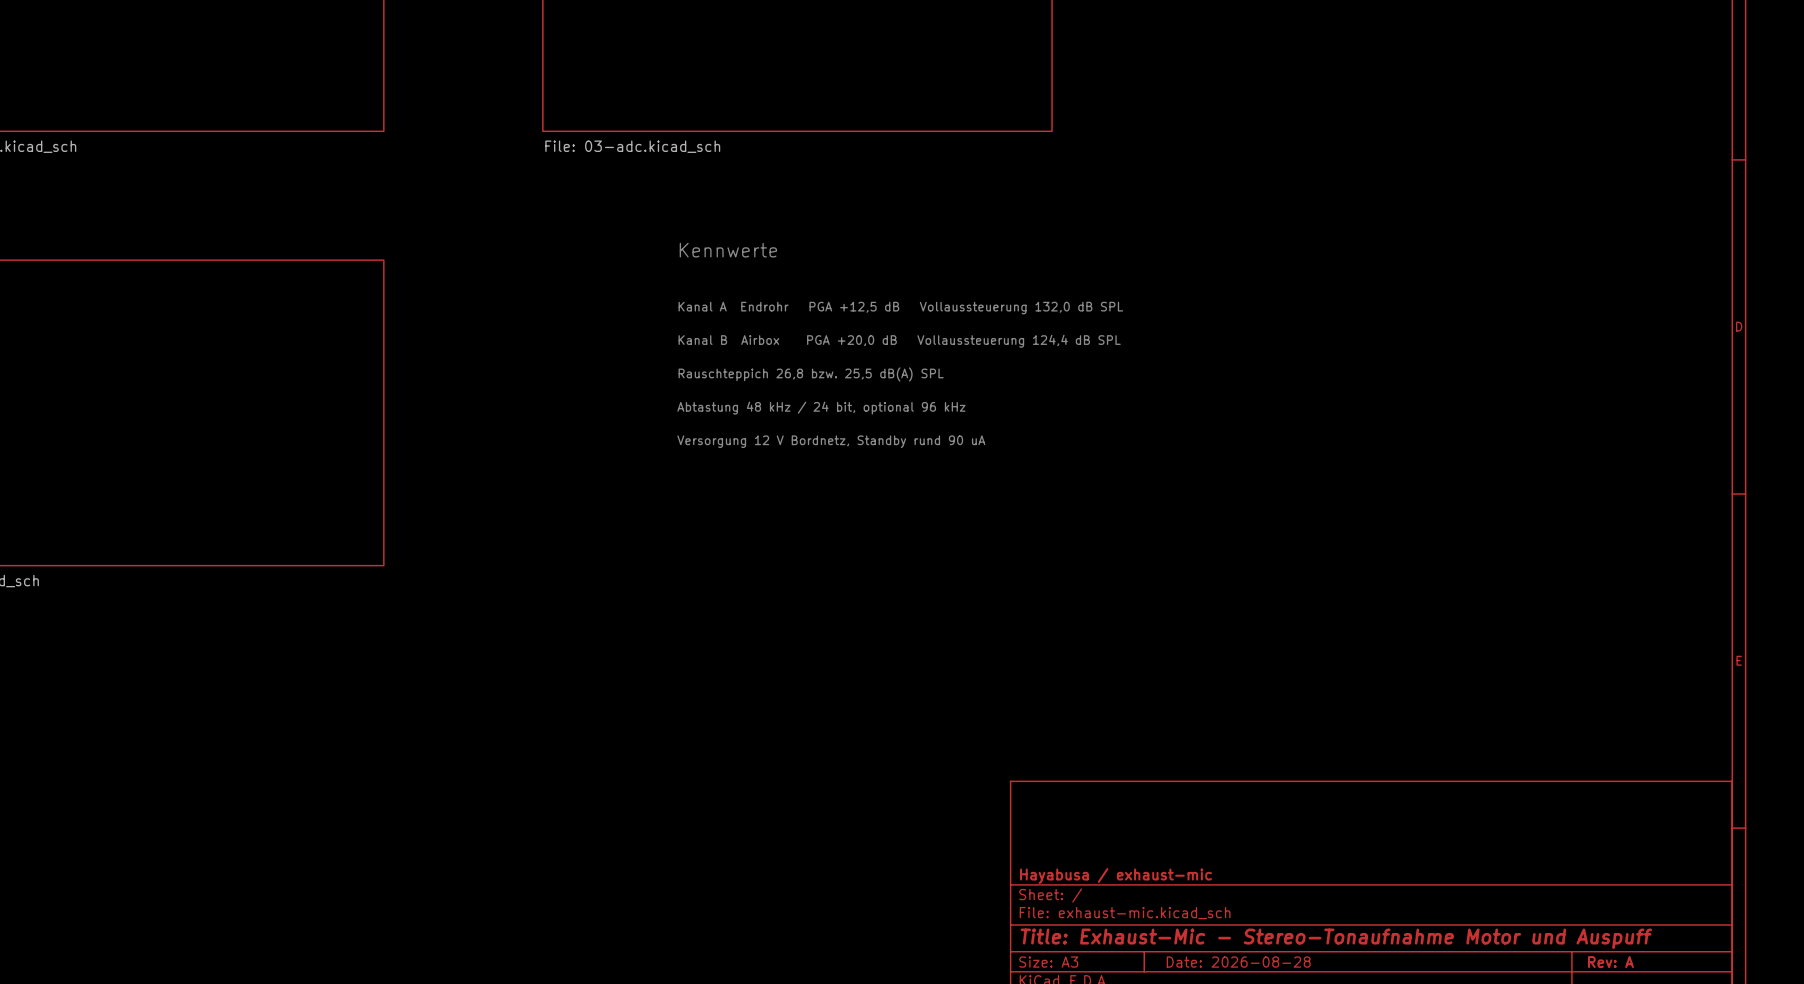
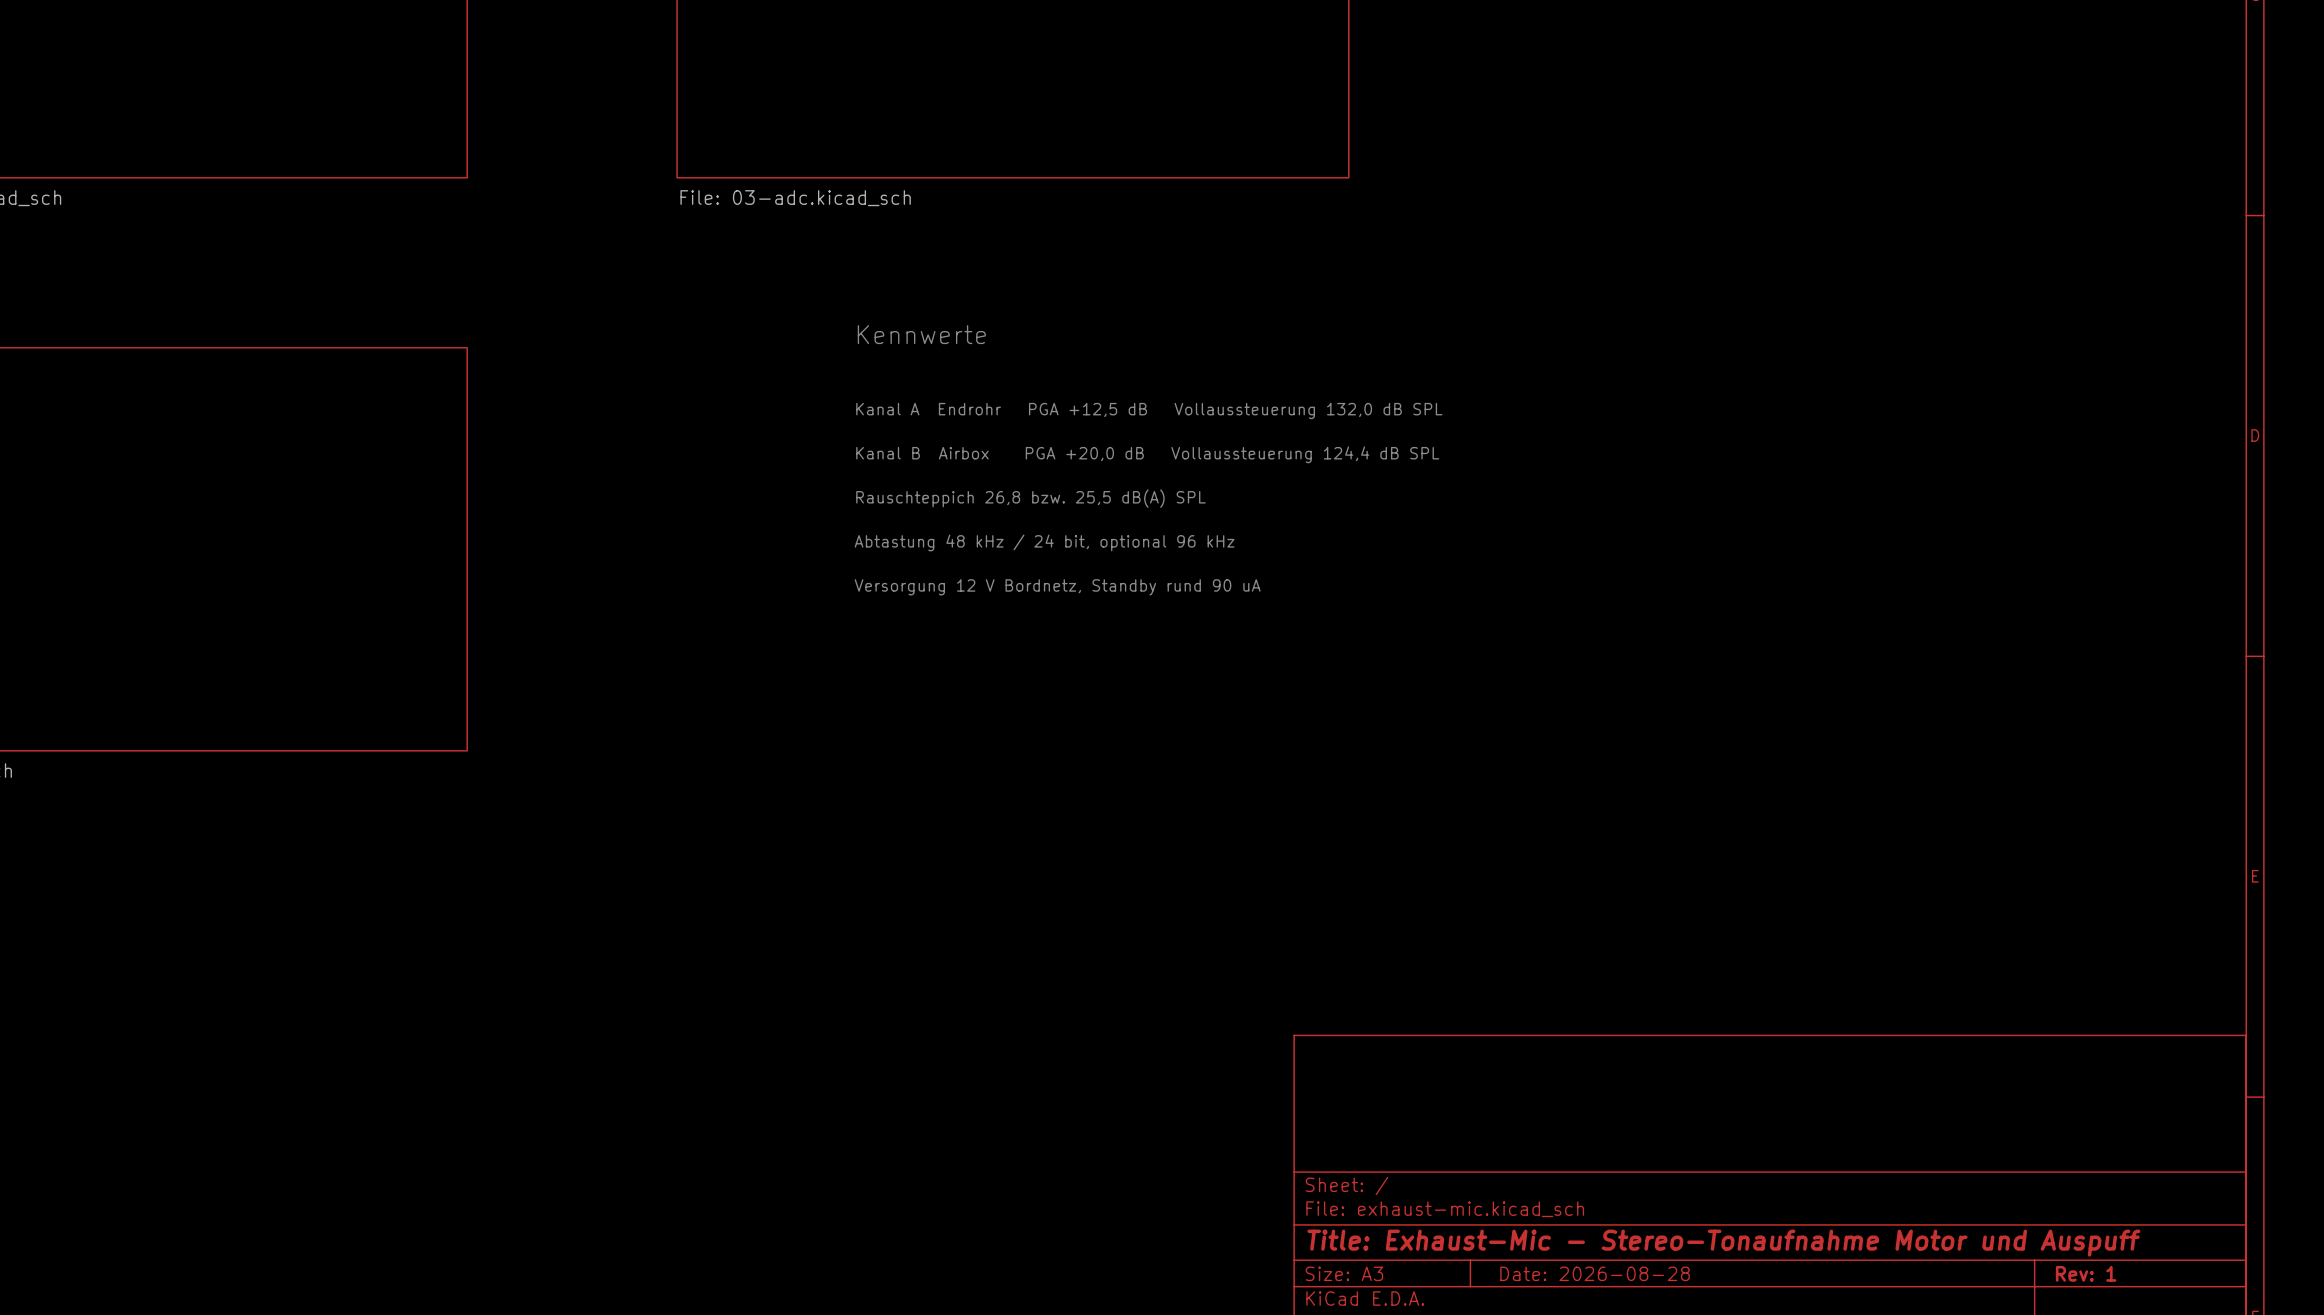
title block: Hayabusa / exhaust-mic (1115, 875) -> none
title block: Rev: A (1610, 962) -> Rev: 1 (2086, 1273)

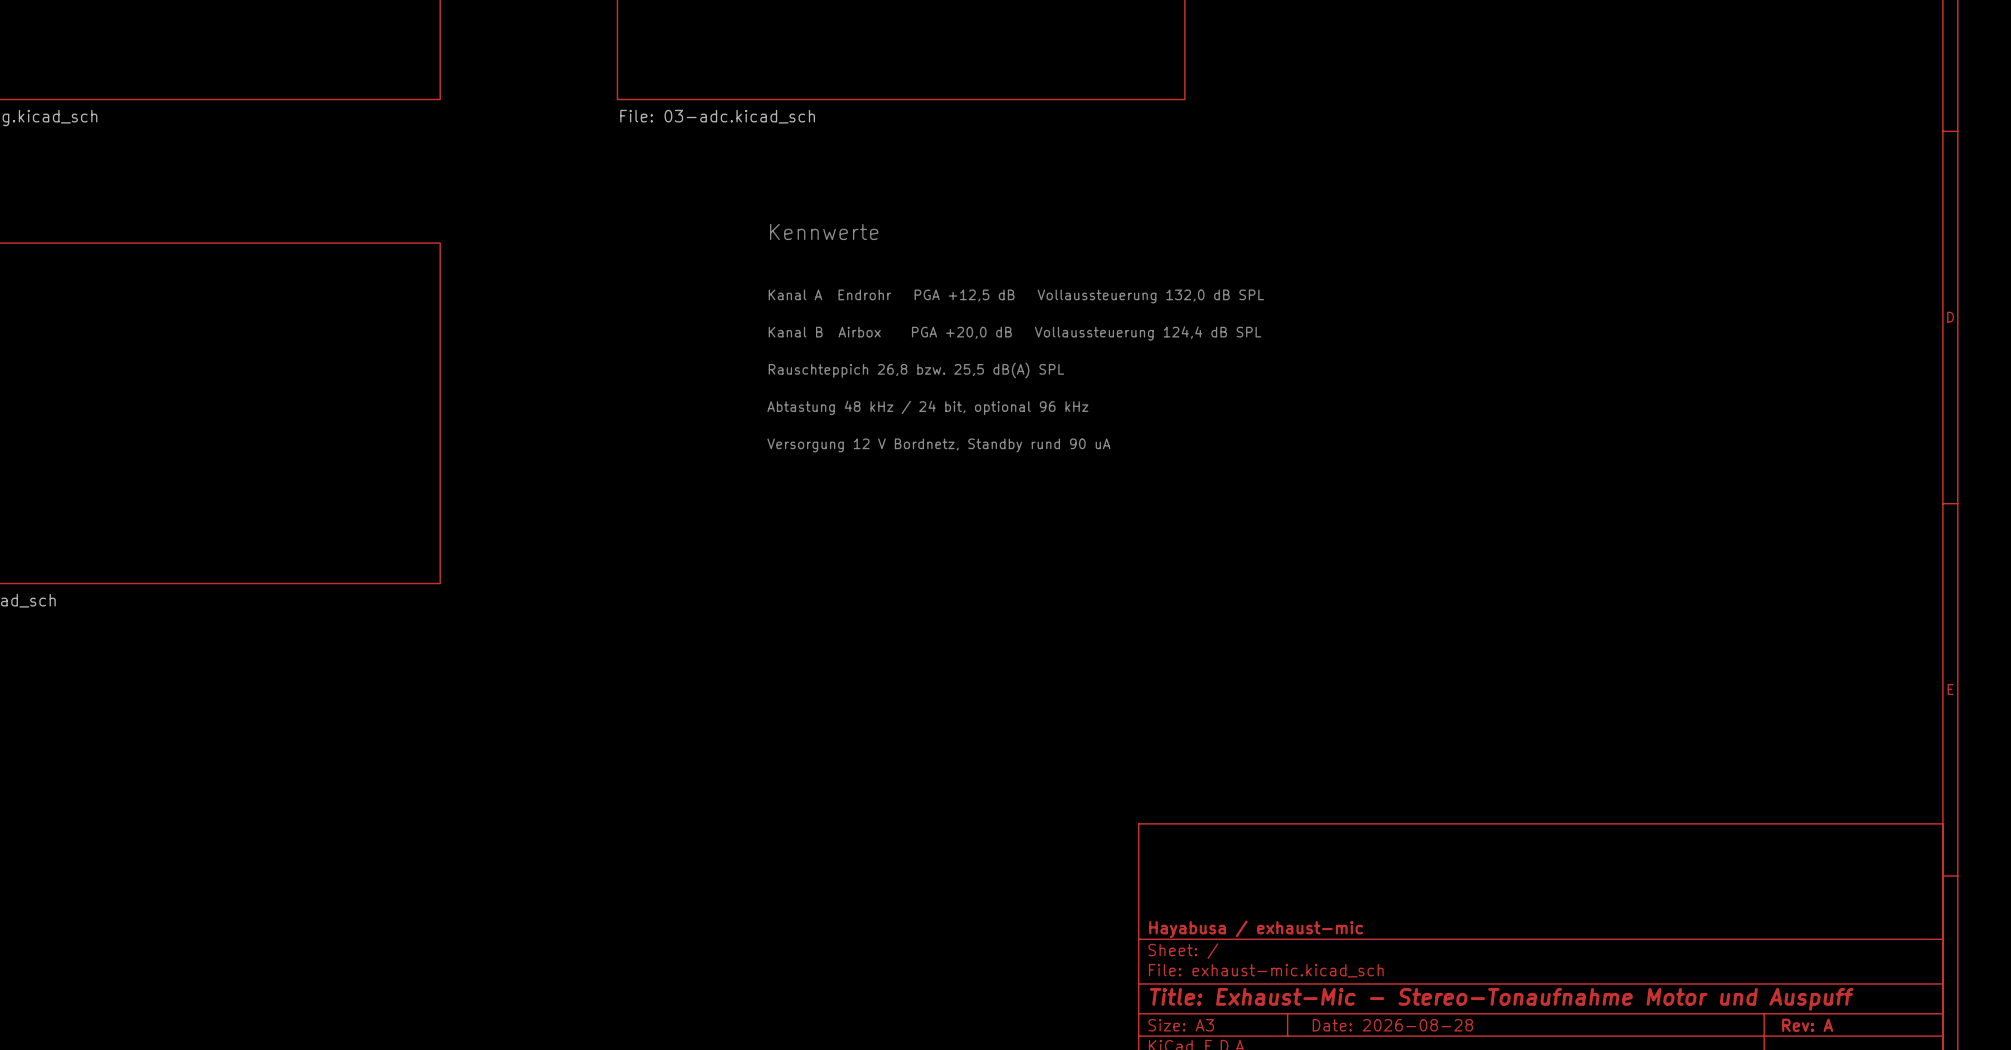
title block: none -> Hayabusa / exhaust-mic (1256, 929)
title block: Rev: 1 (2086, 1273) -> Rev: A (1807, 1025)

